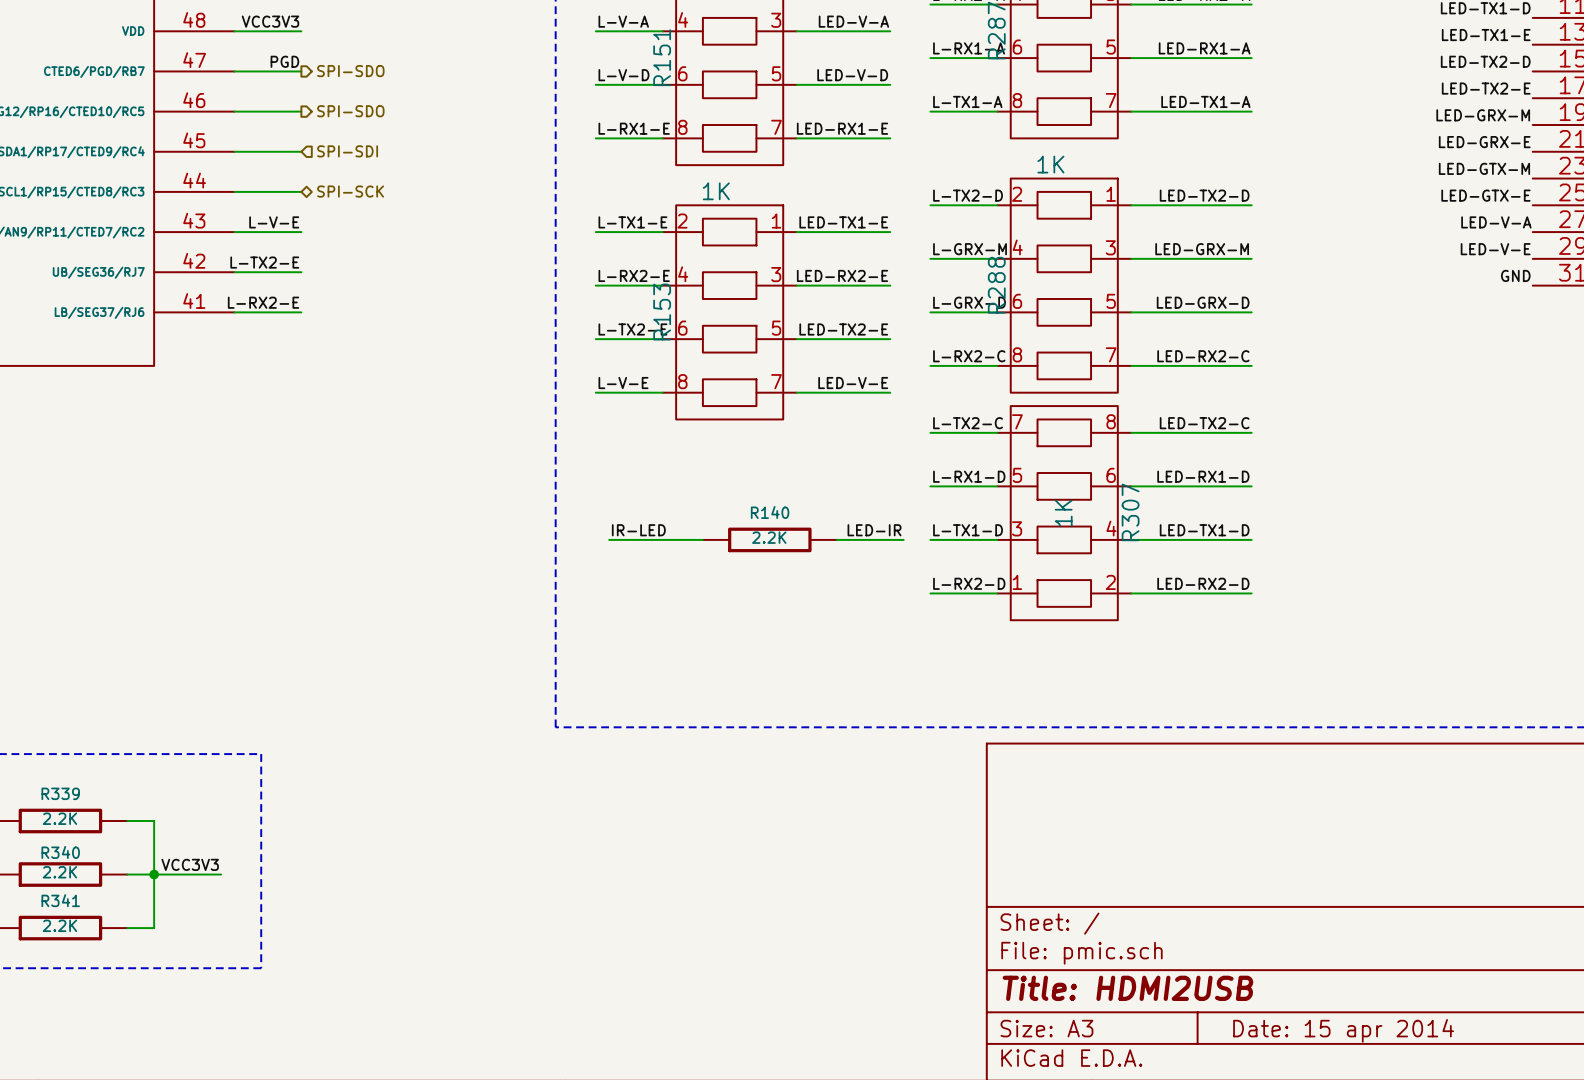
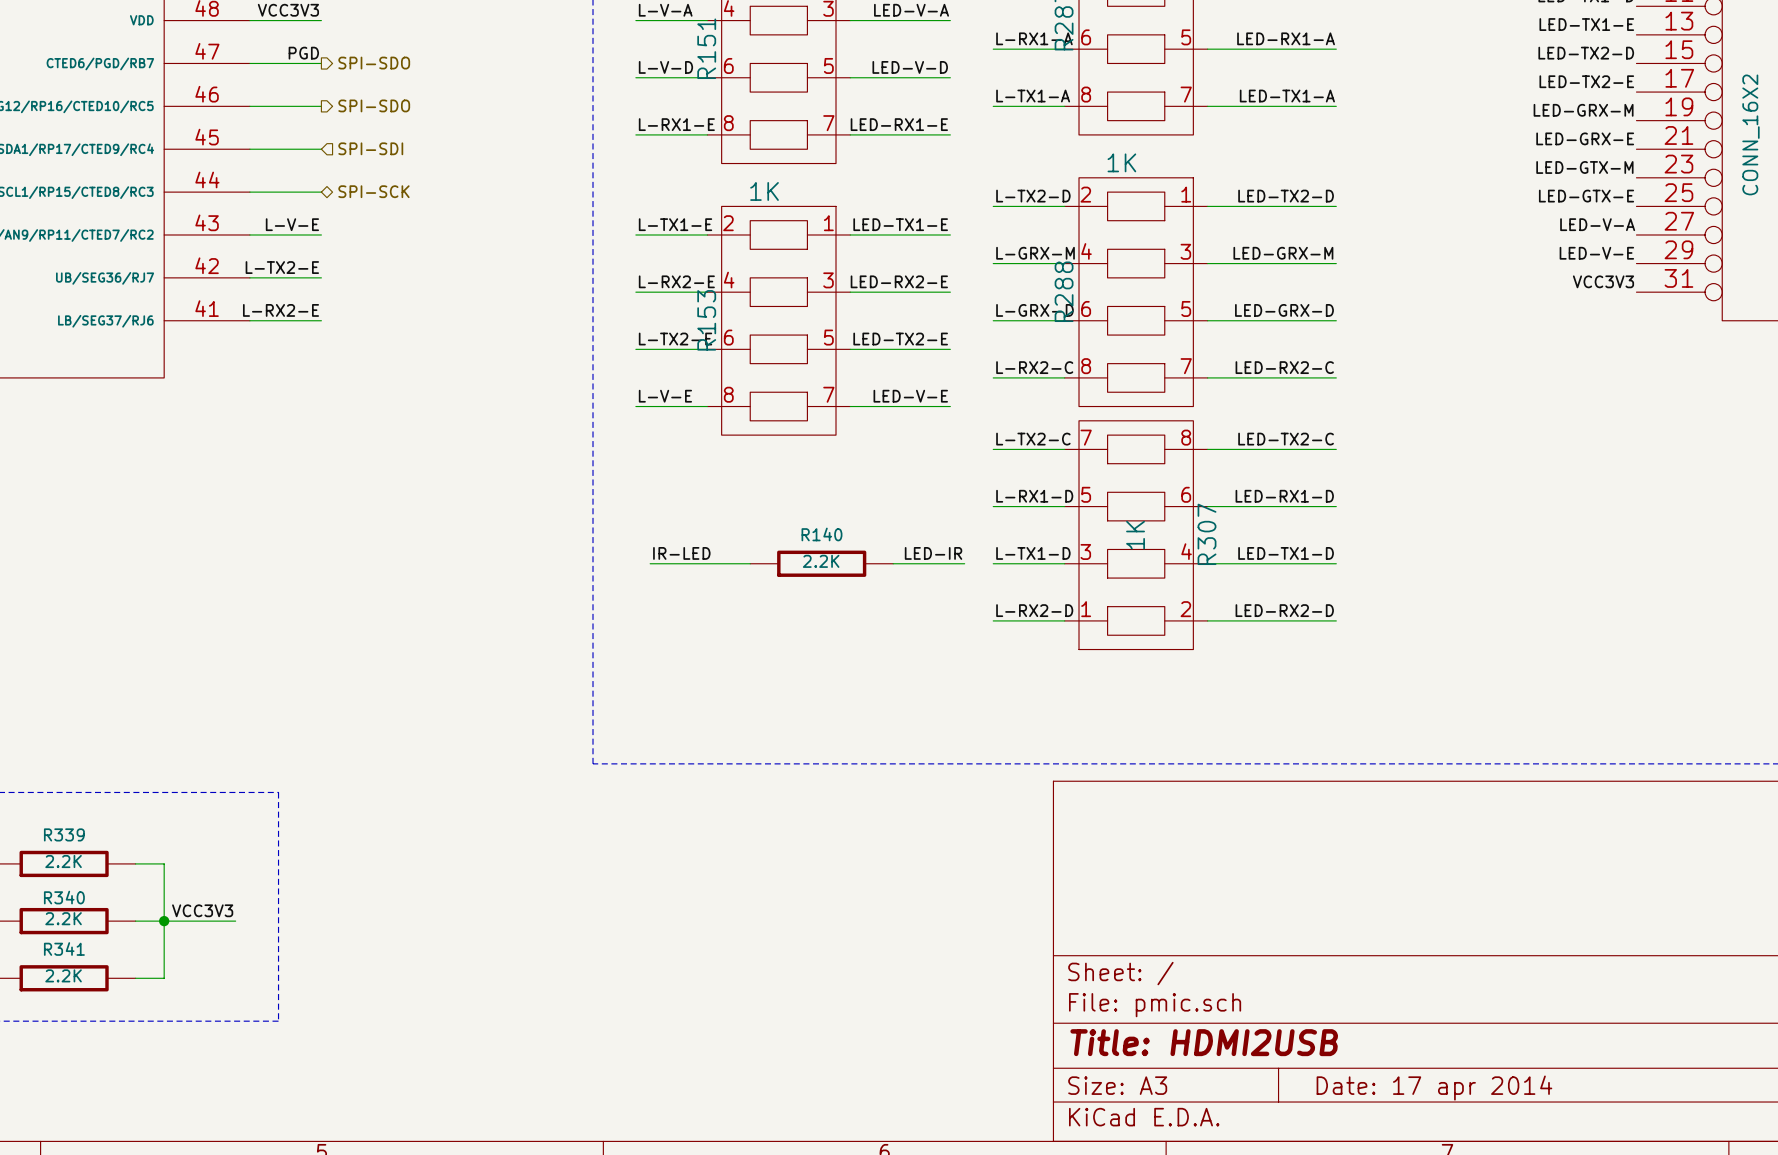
label: GND (1515, 275) -> VCC3V3 (1603, 281)
title block: Date: 15 apr 2014 (1343, 1030) -> Date: 17 apr 2014 (1434, 1088)

